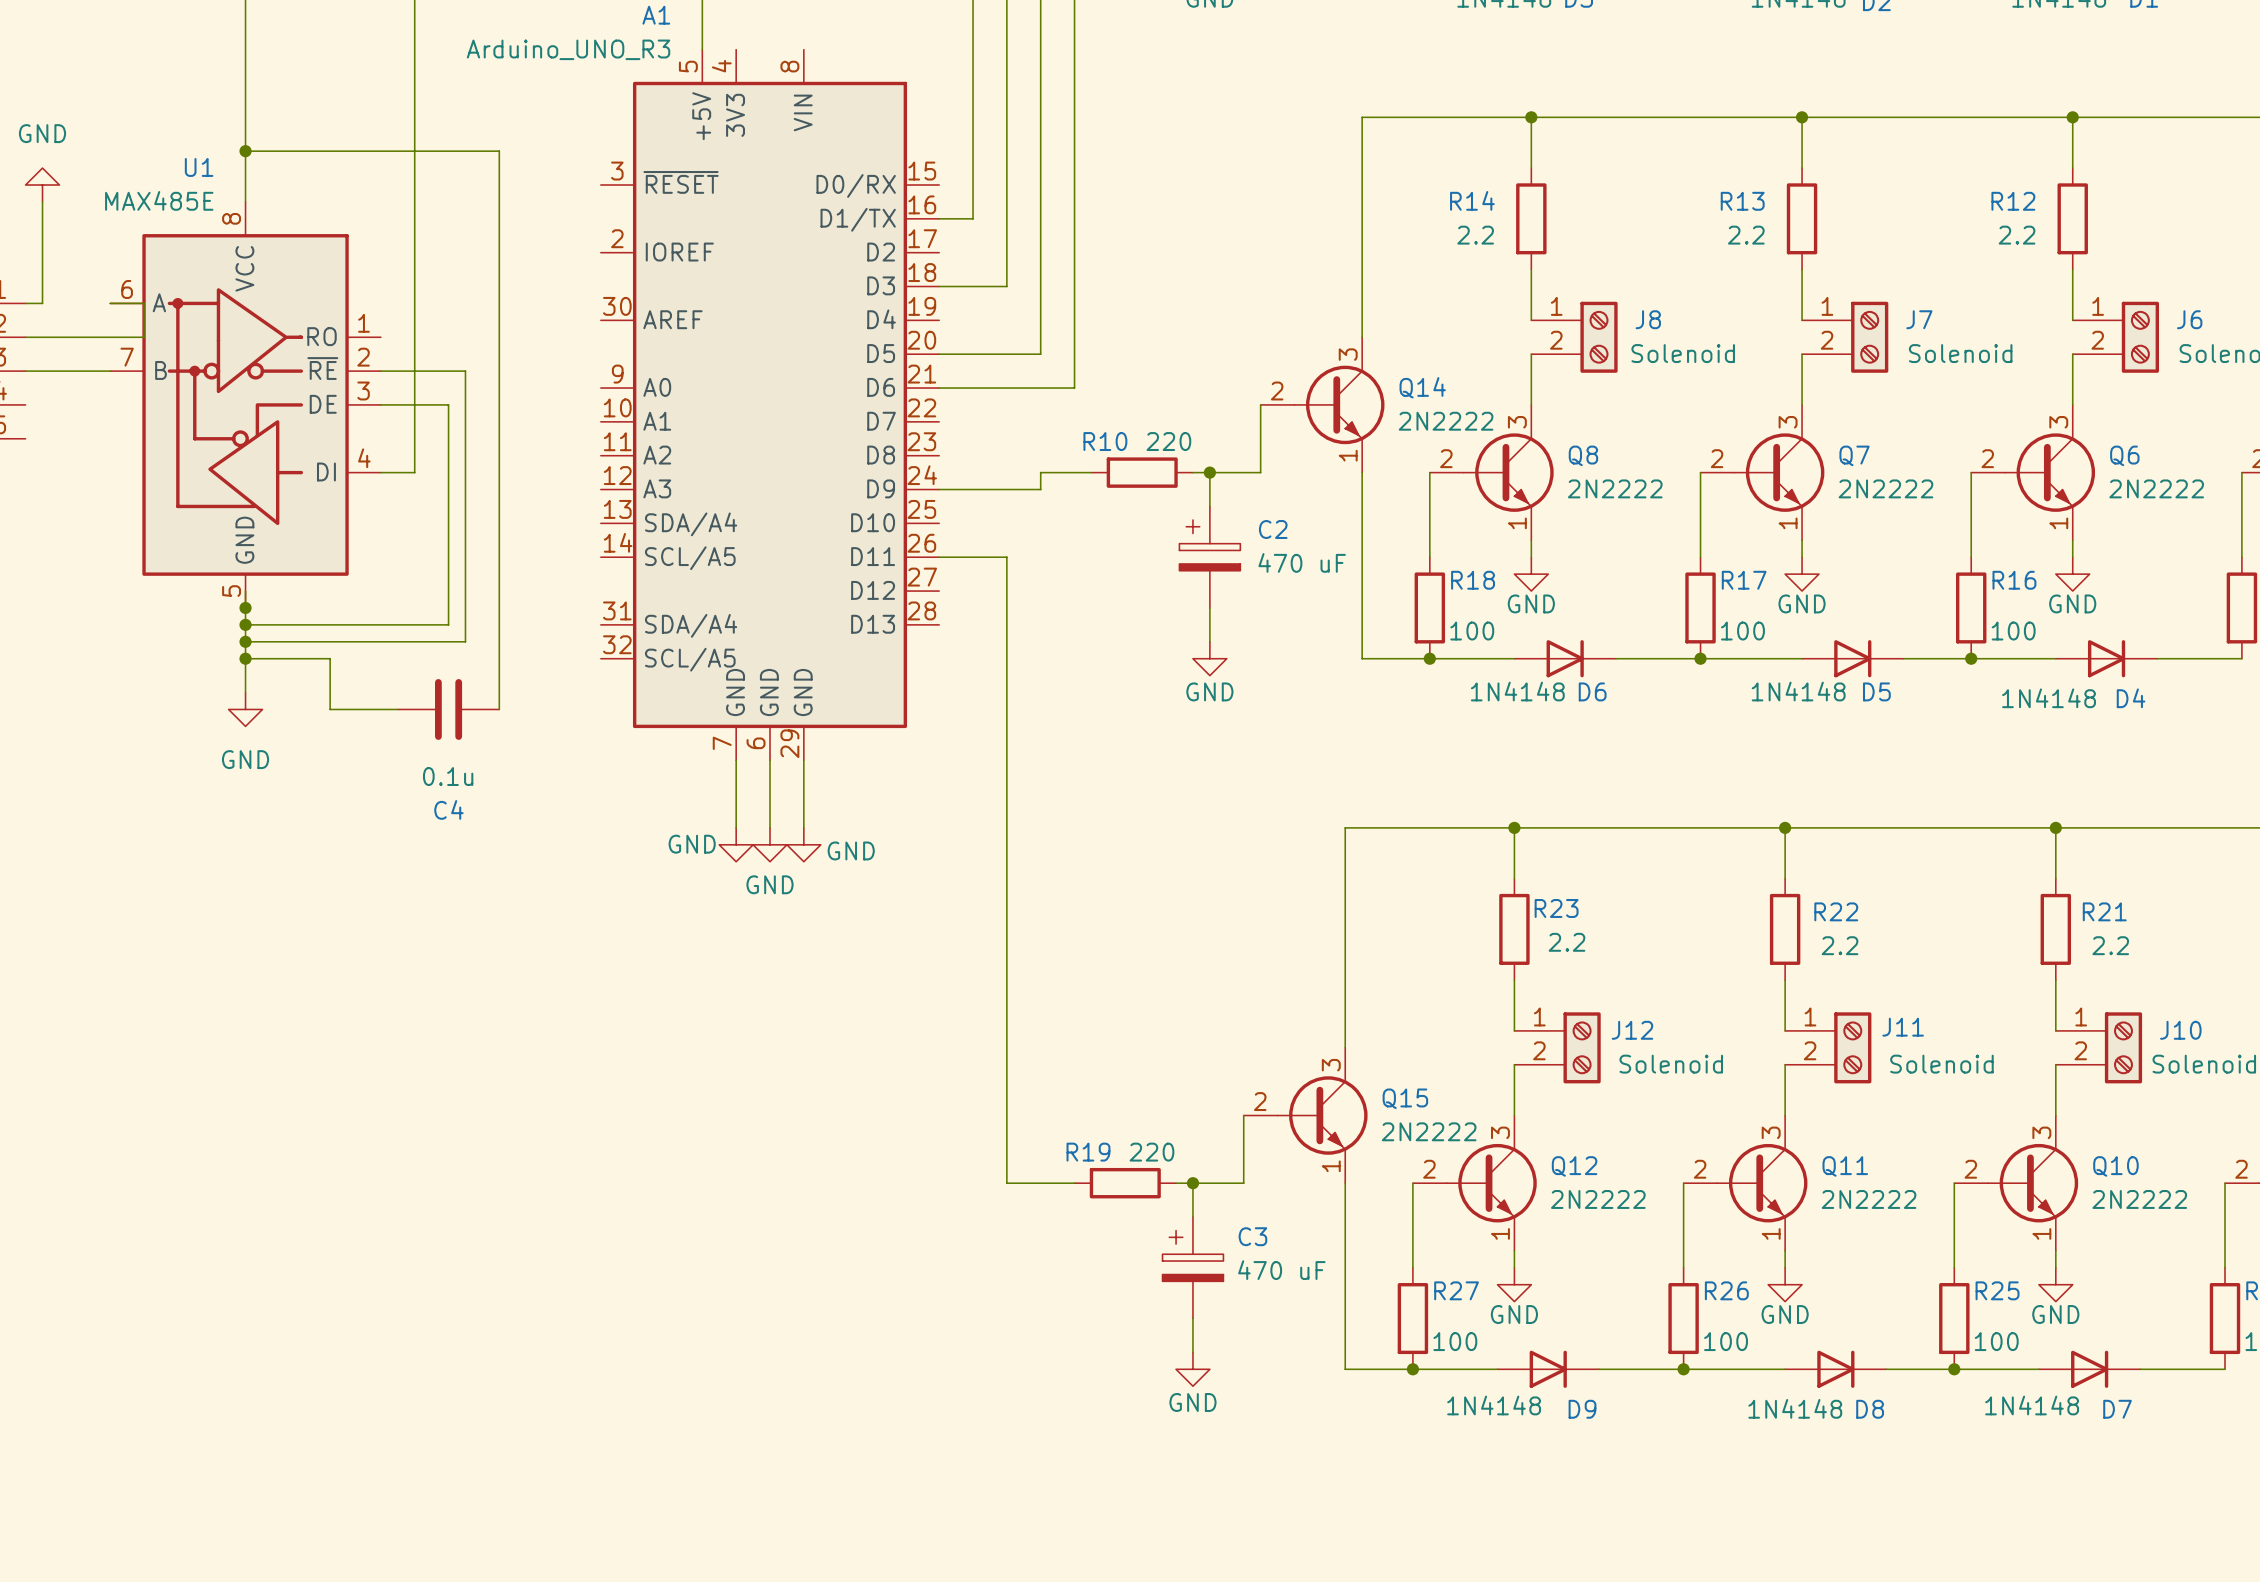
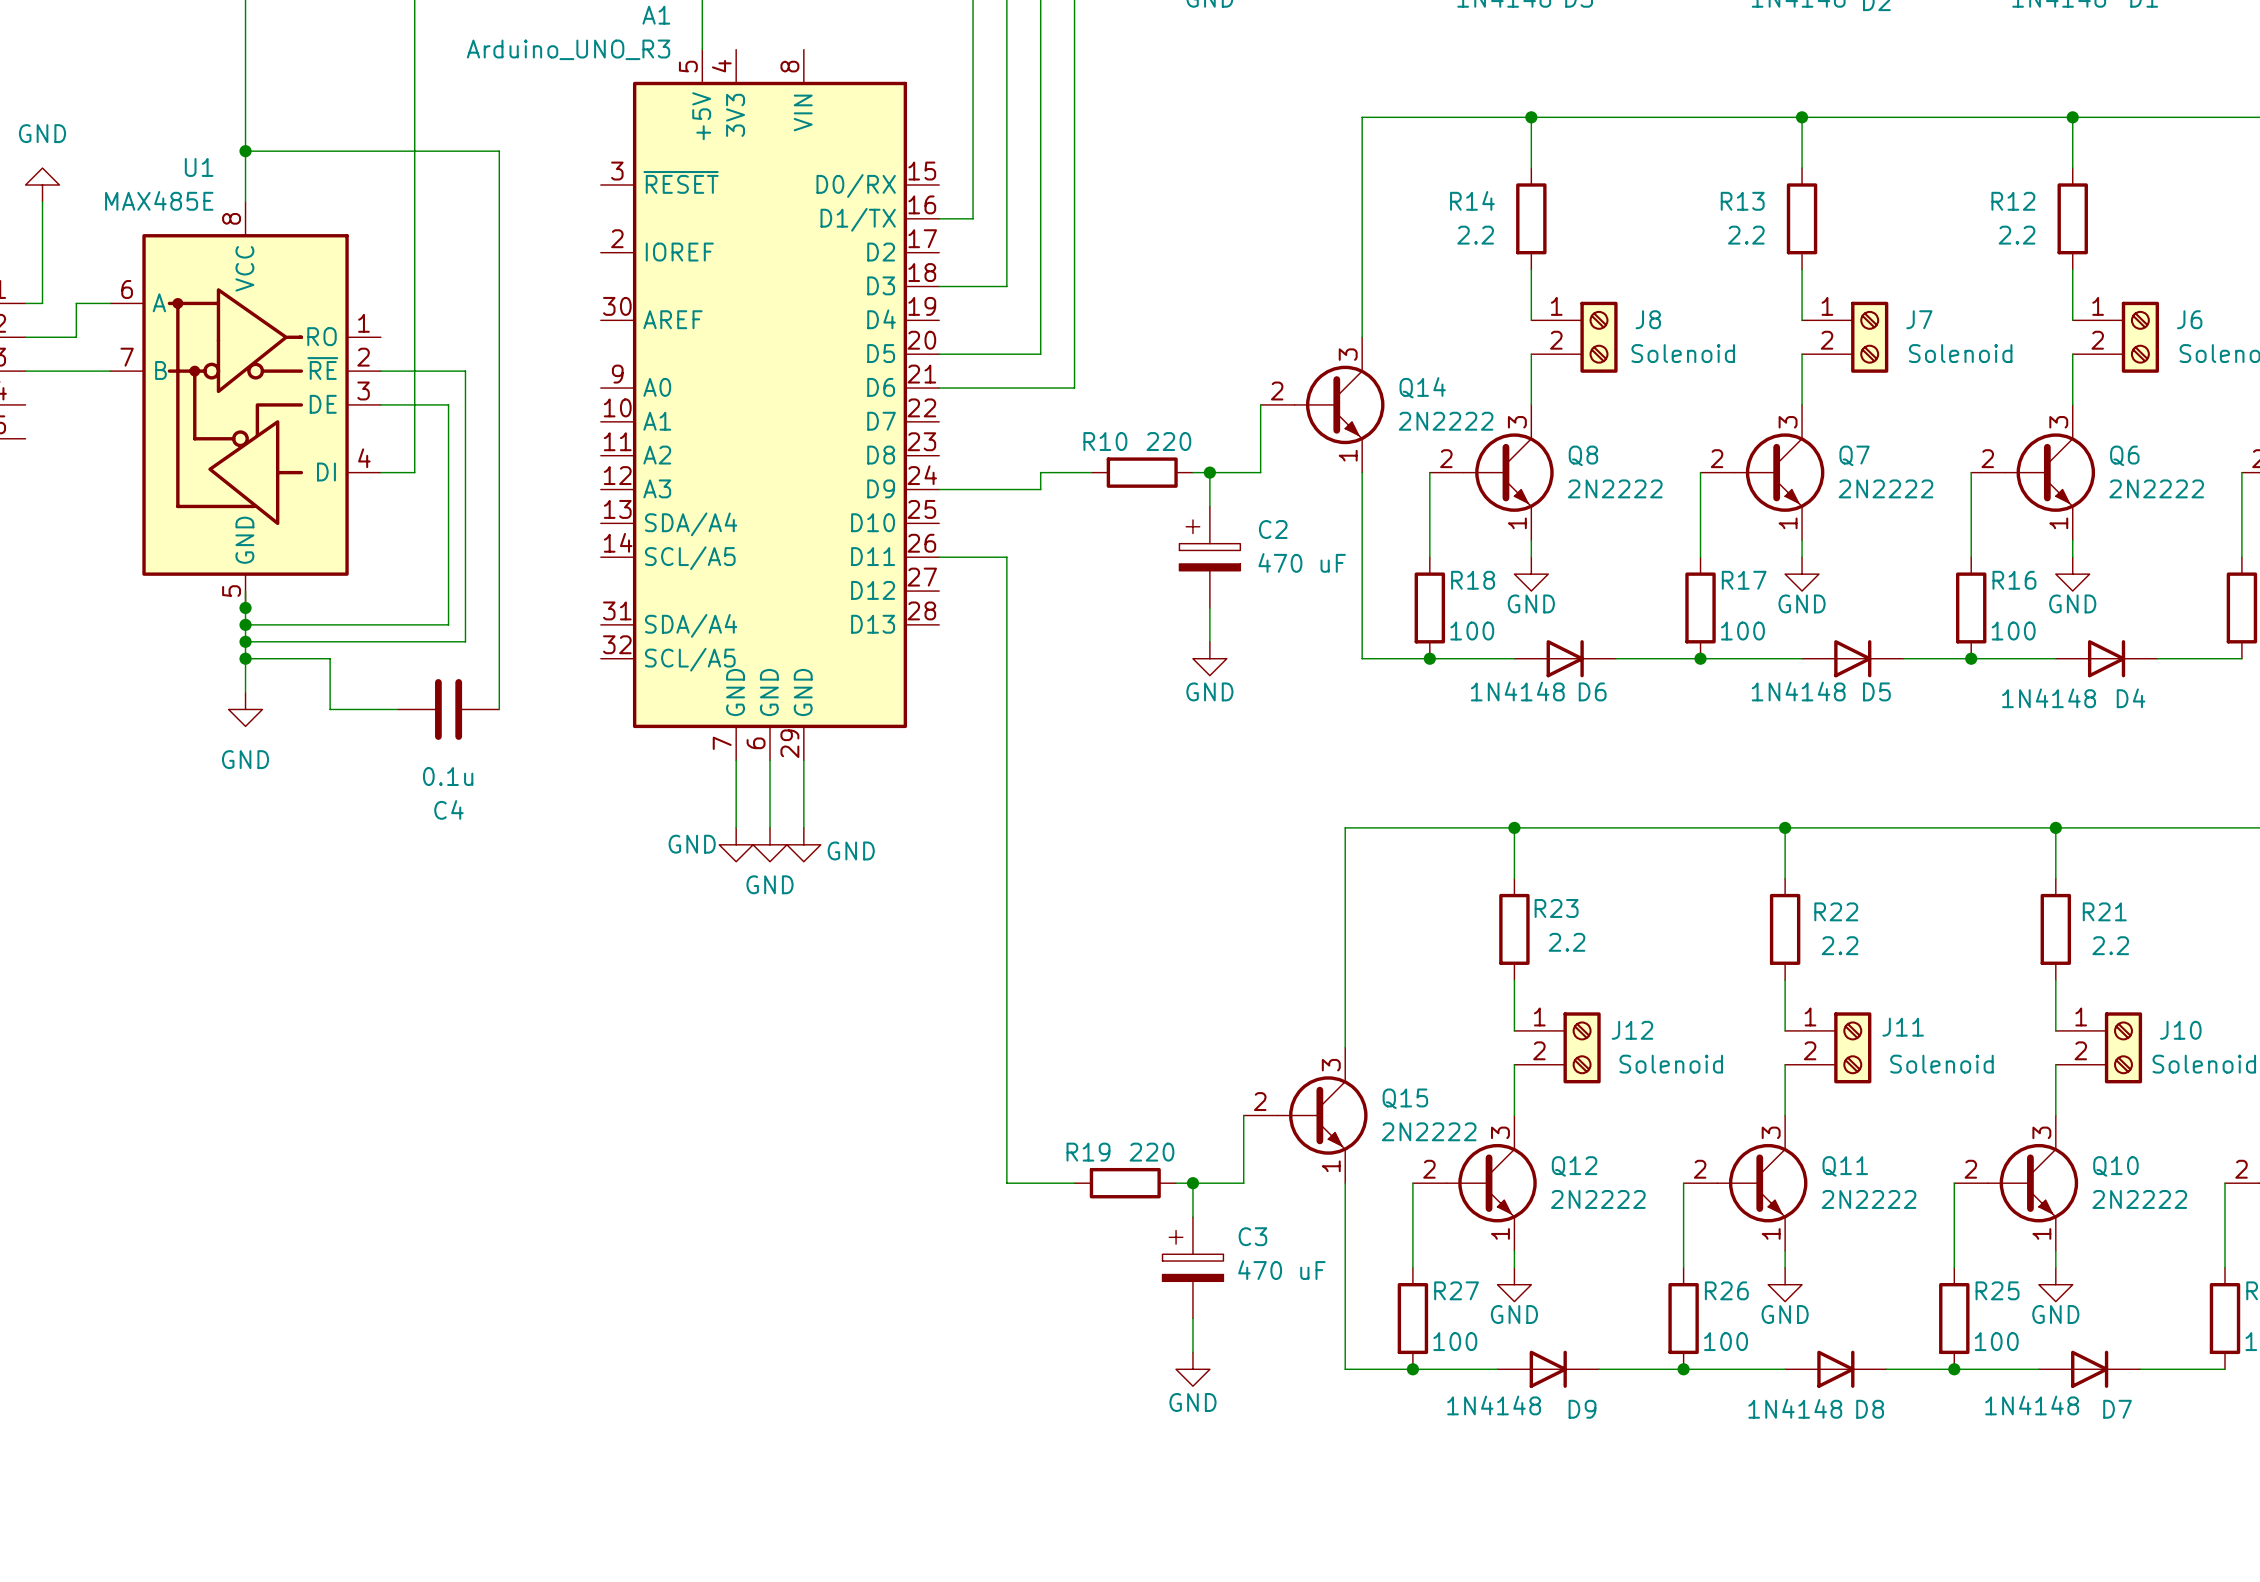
wire: (110, 303) (144, 303) (144, 337) (76, 337) -> (110, 303) (76, 303) (76, 337)

